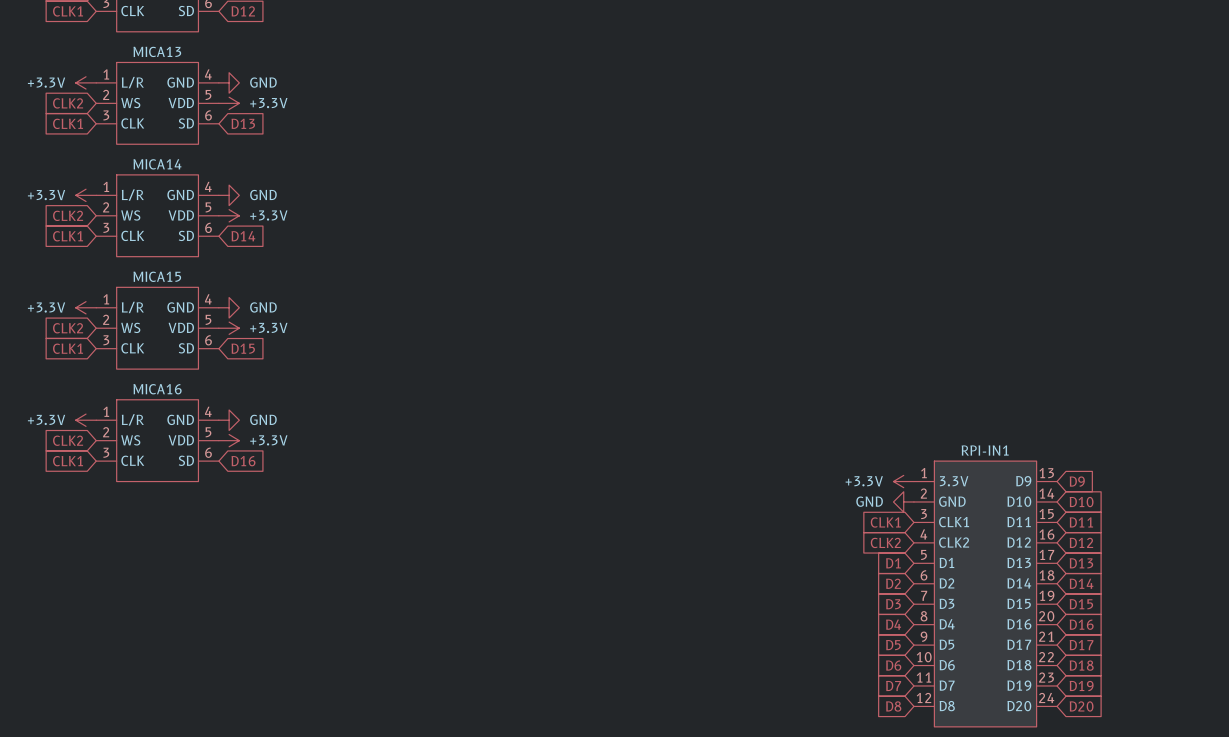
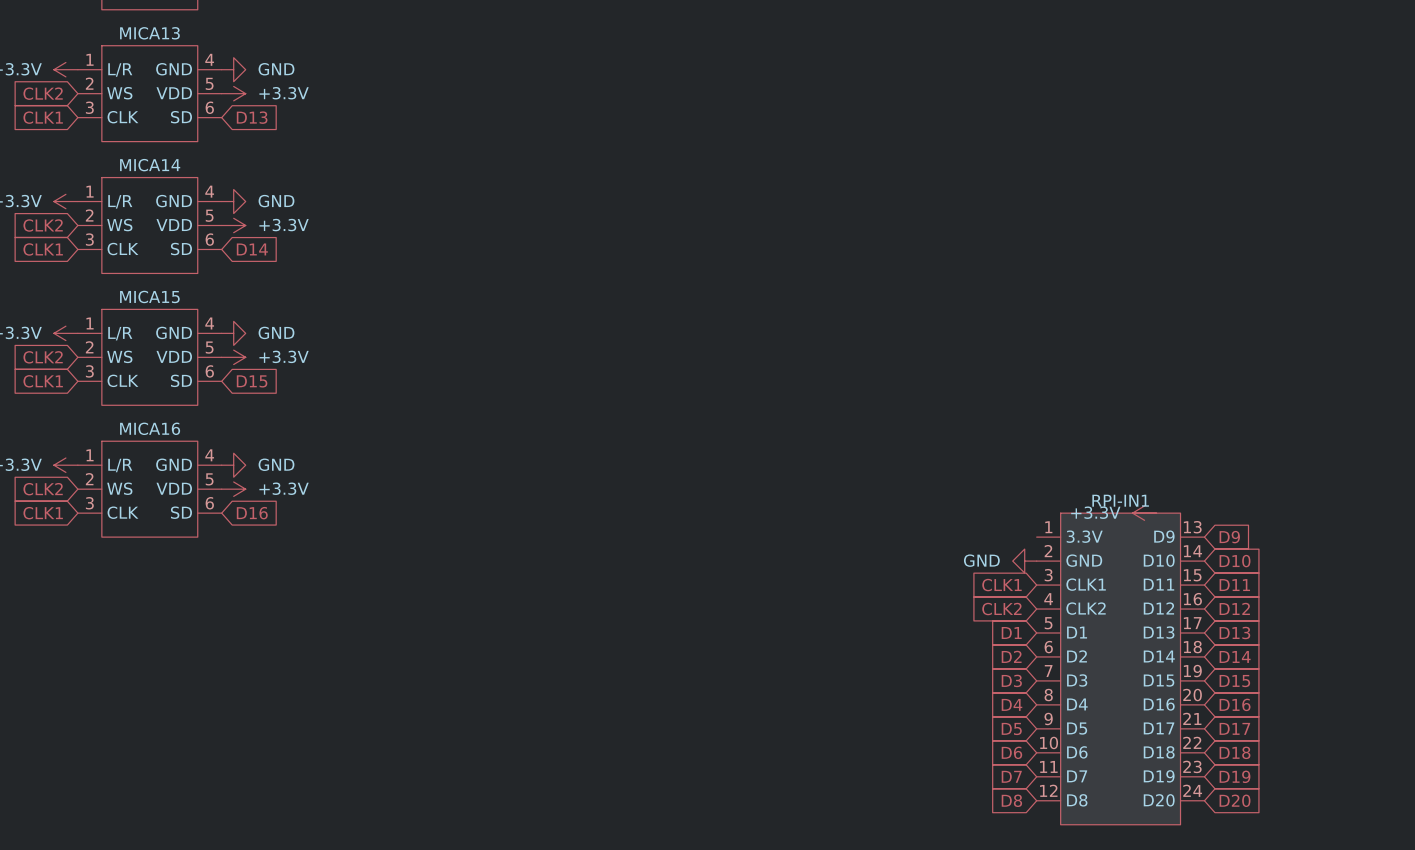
power symbol position: +3.3V (903, 481) -> +3.3V (1144, 513)

